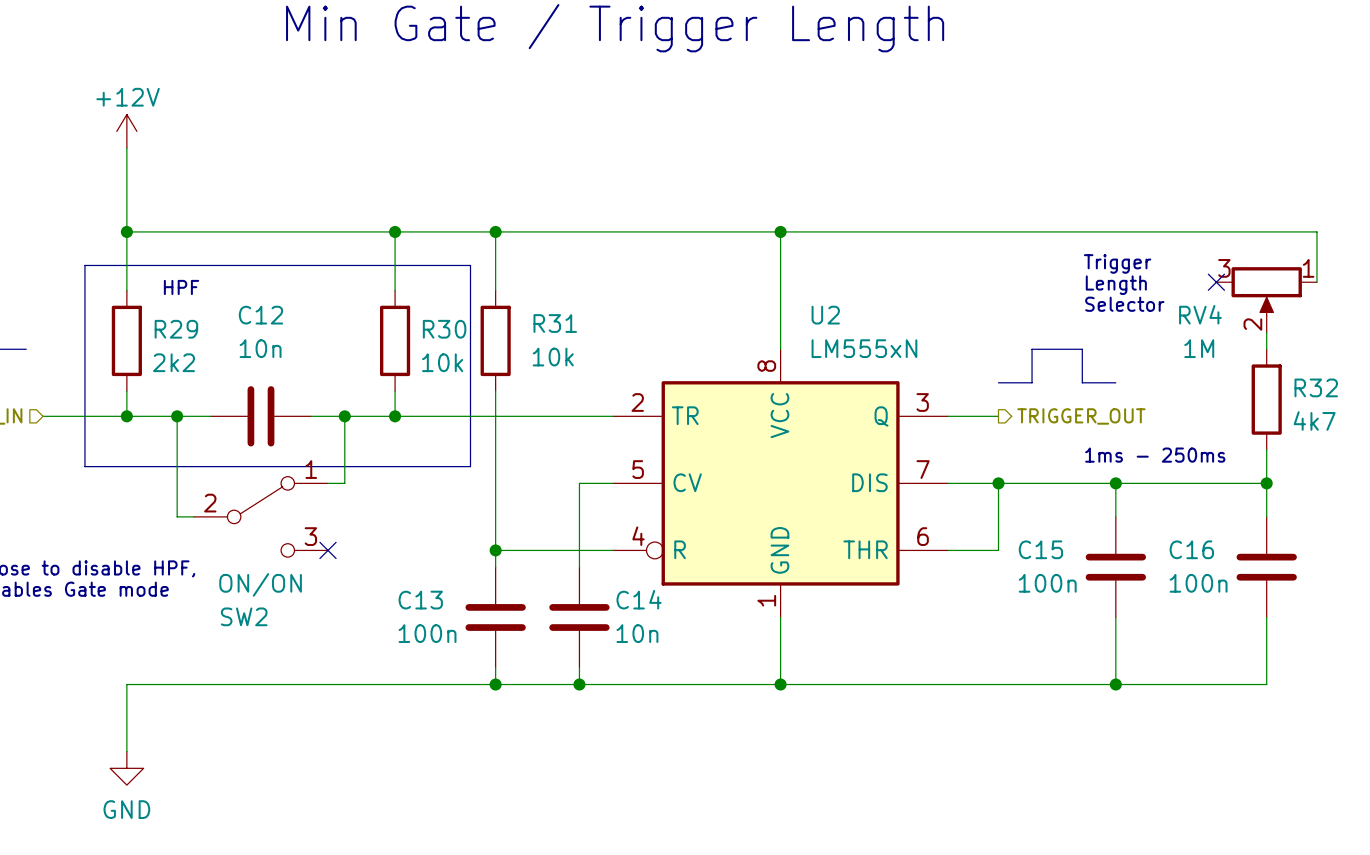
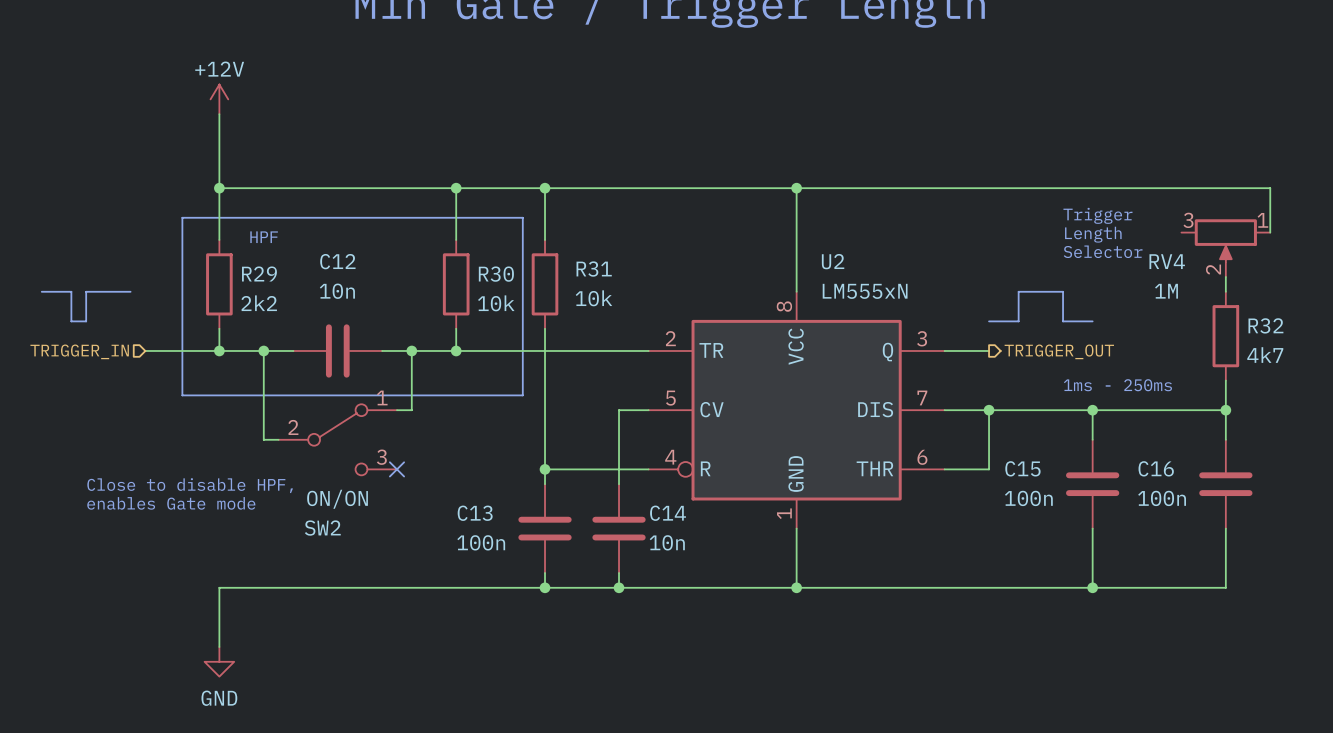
no-connect mark: (1216, 282) -> none

